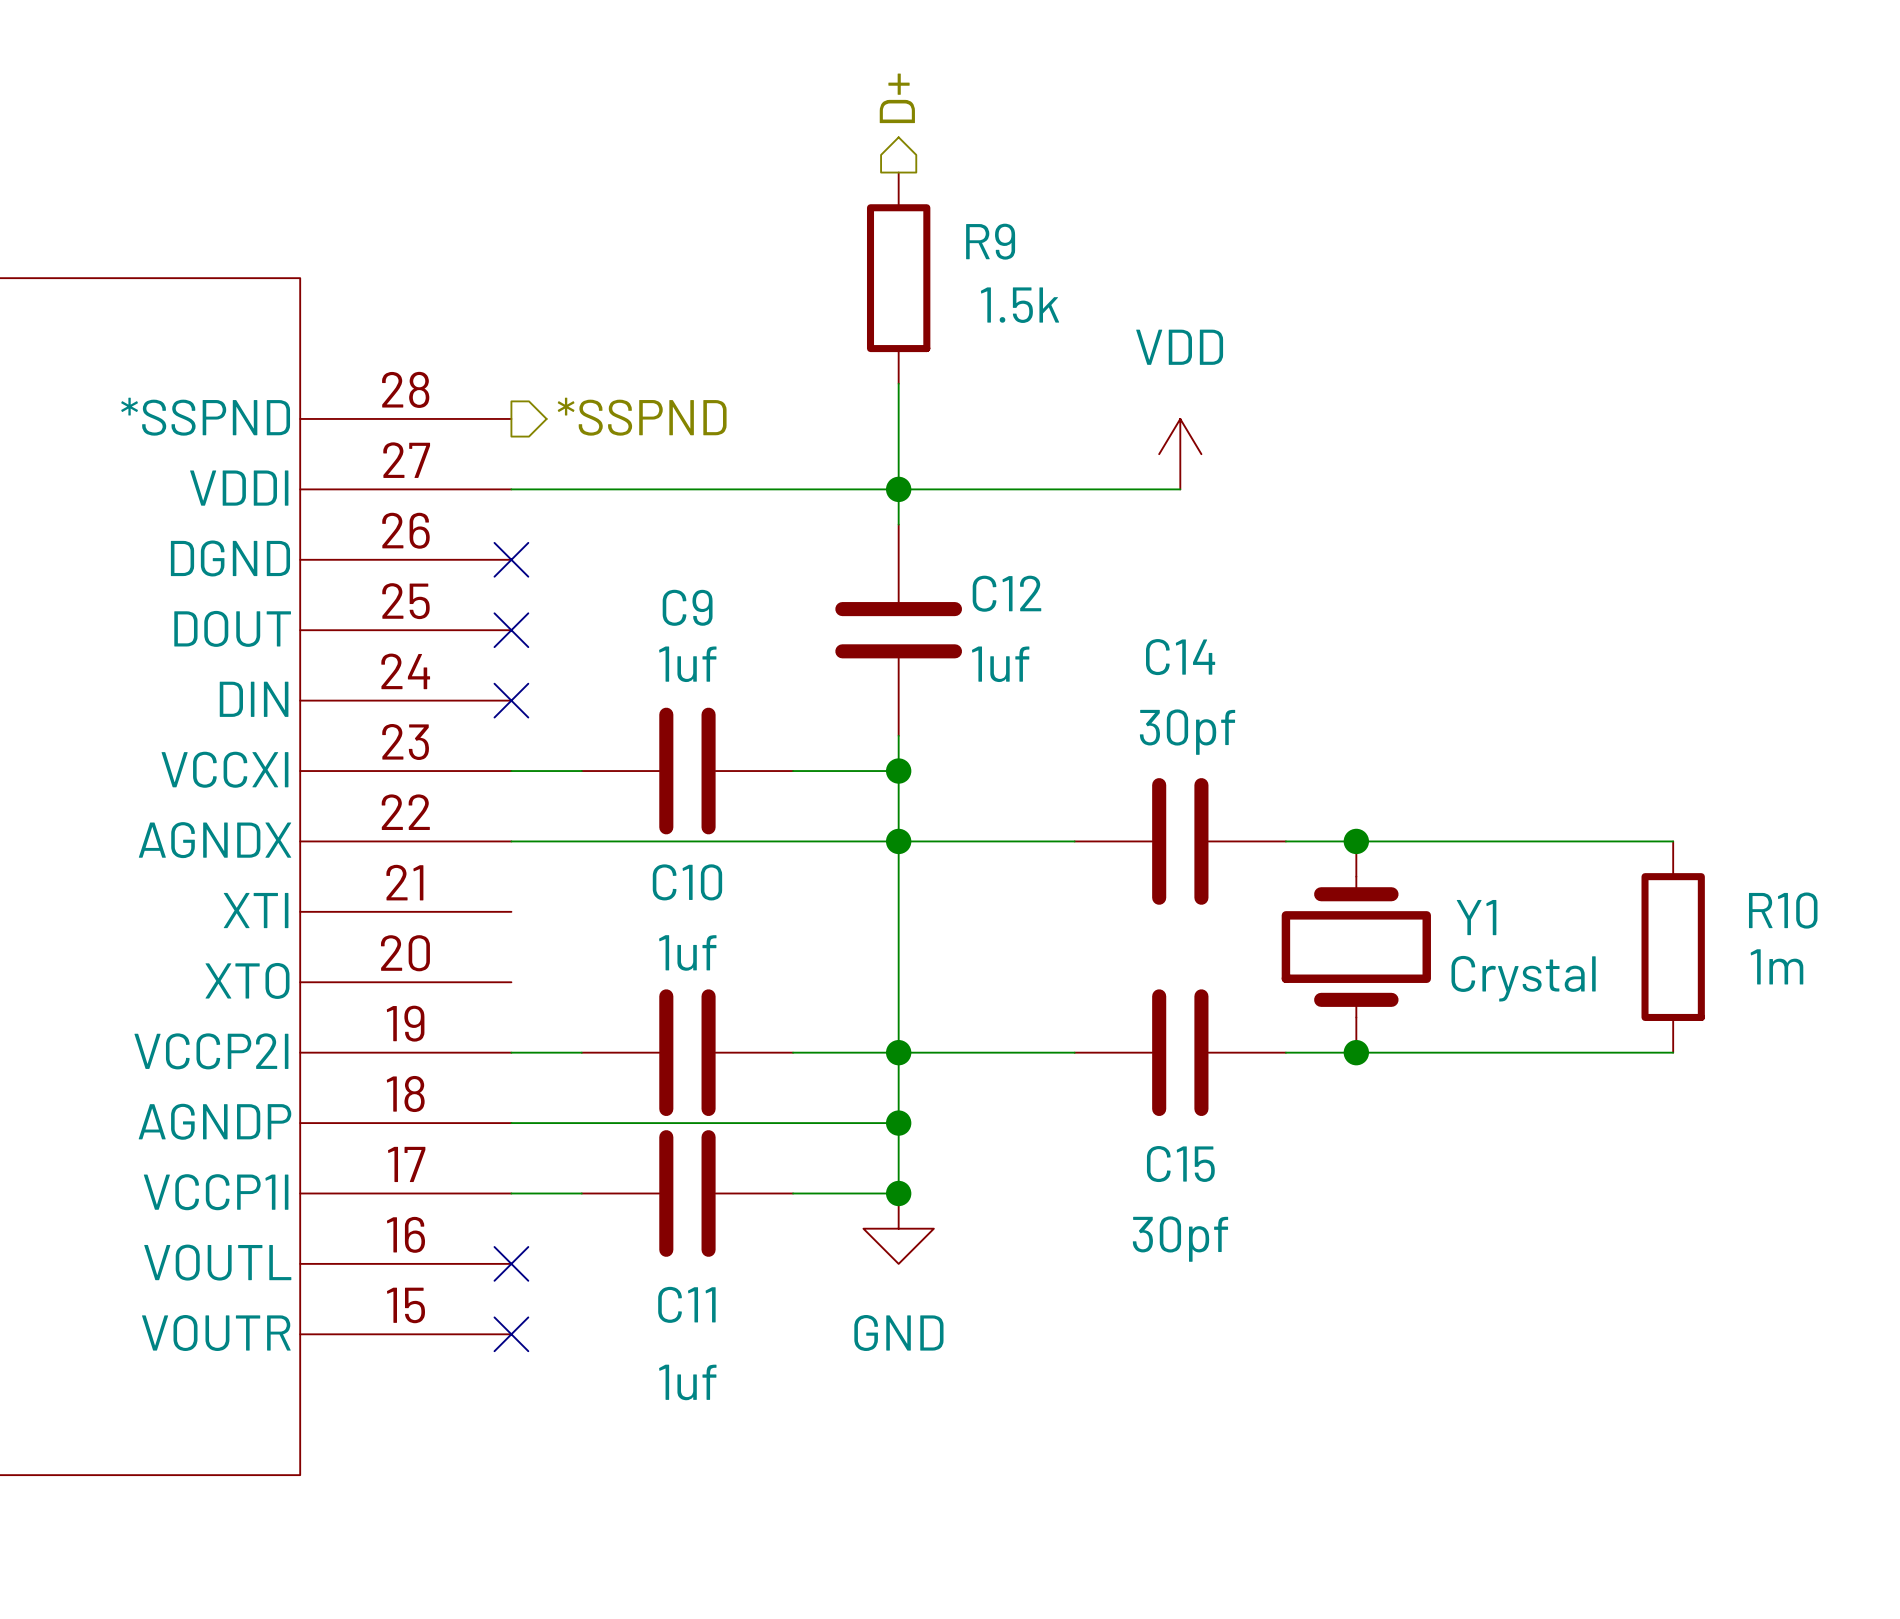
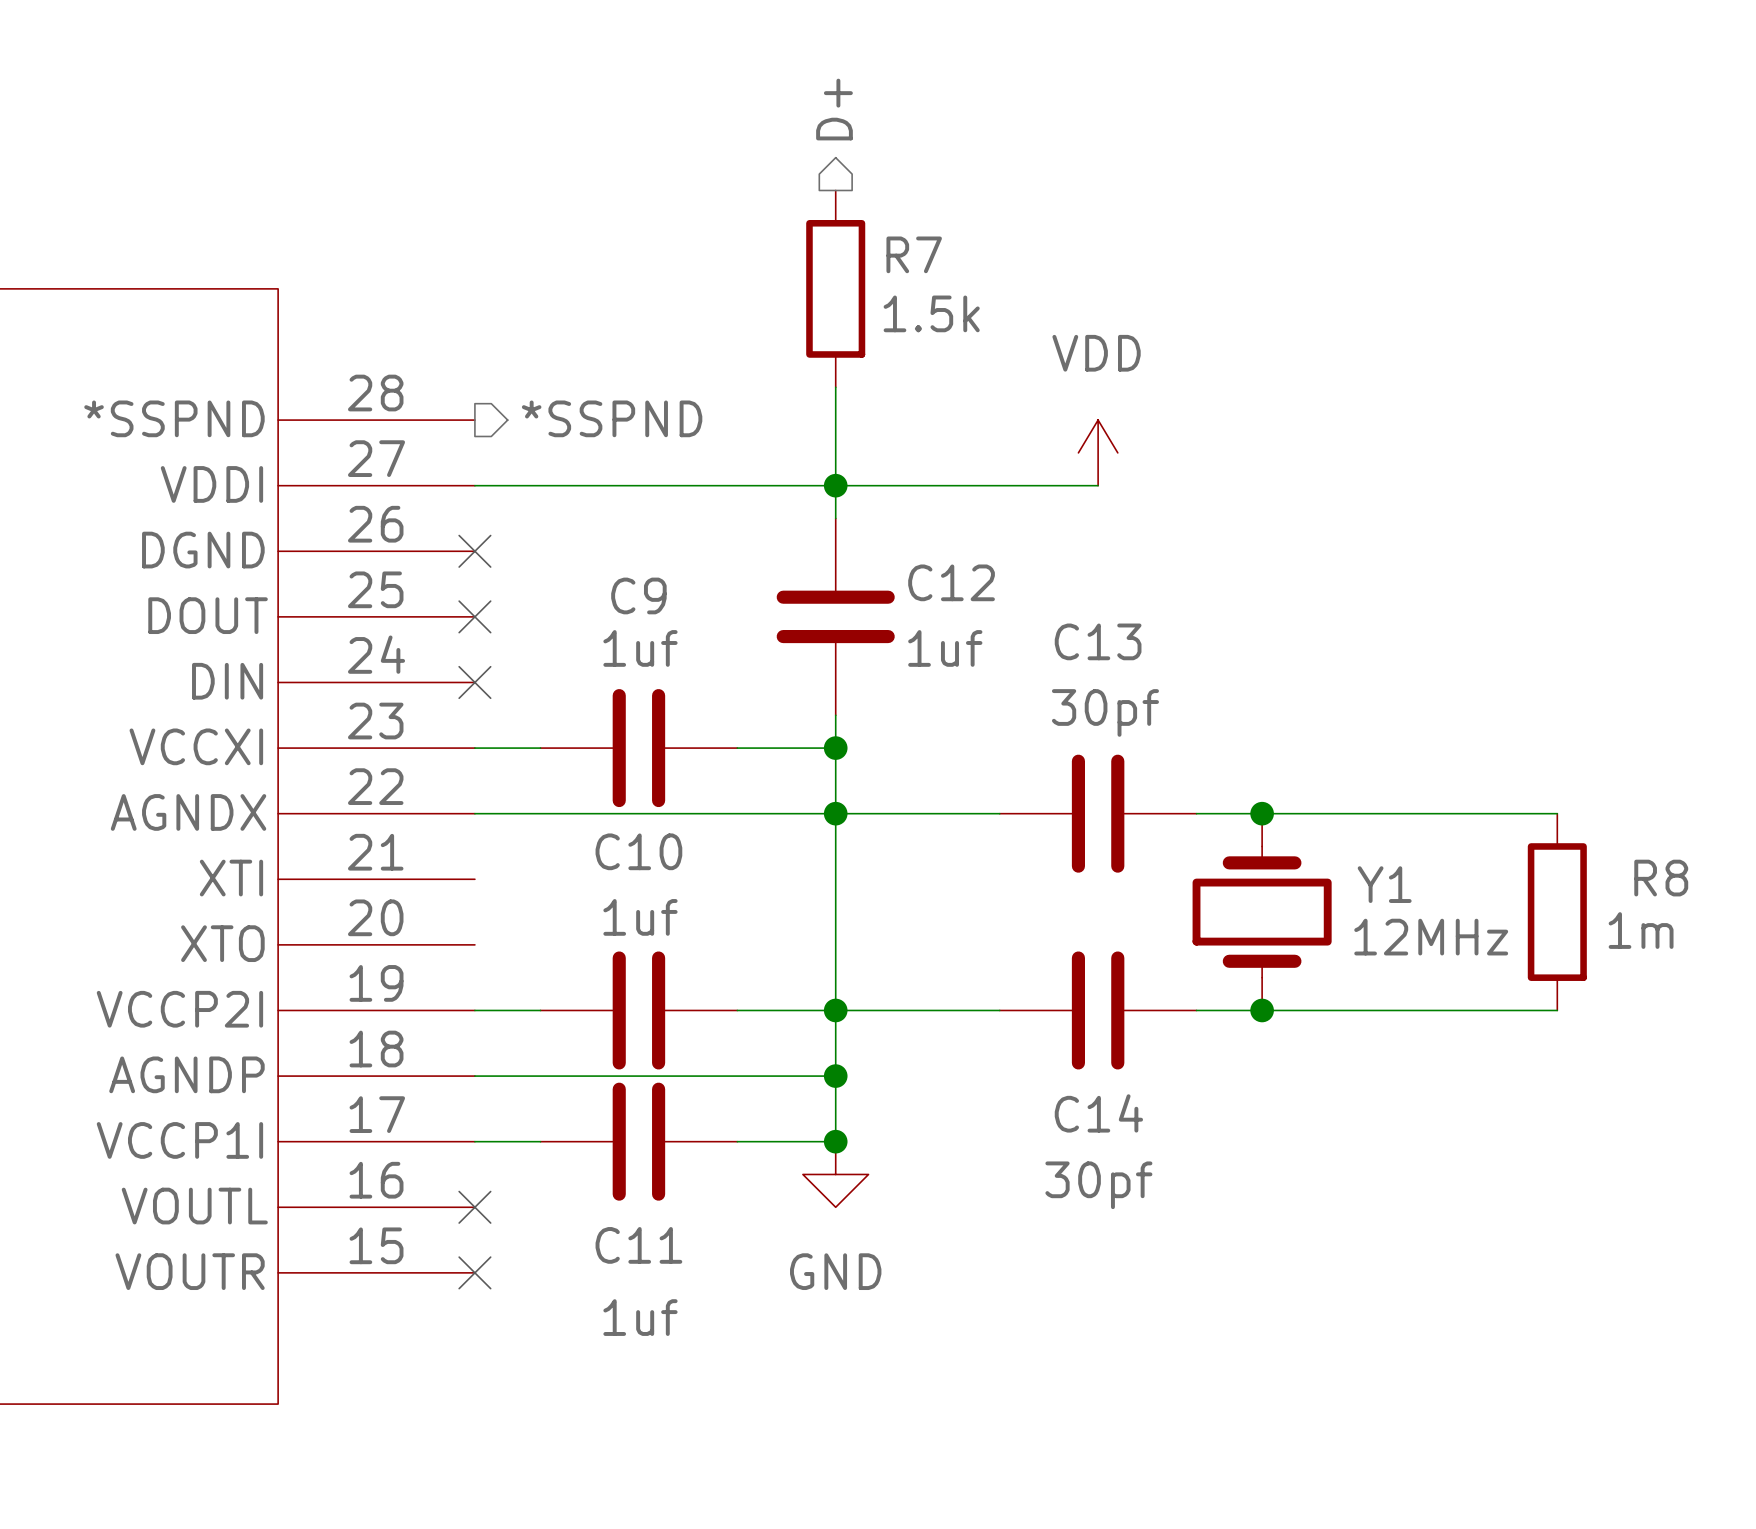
R9 name: R9 (990, 241) -> R7 (914, 254)
C14 name: C14 (1180, 657) -> C13 (1098, 641)
R10 name: R10 (1783, 910) -> R8 (1661, 878)
Y1 value: Crystal (1523, 978) -> 12MHz (1431, 937)
C15 name: C15 (1180, 1164) -> C14 (1098, 1113)

